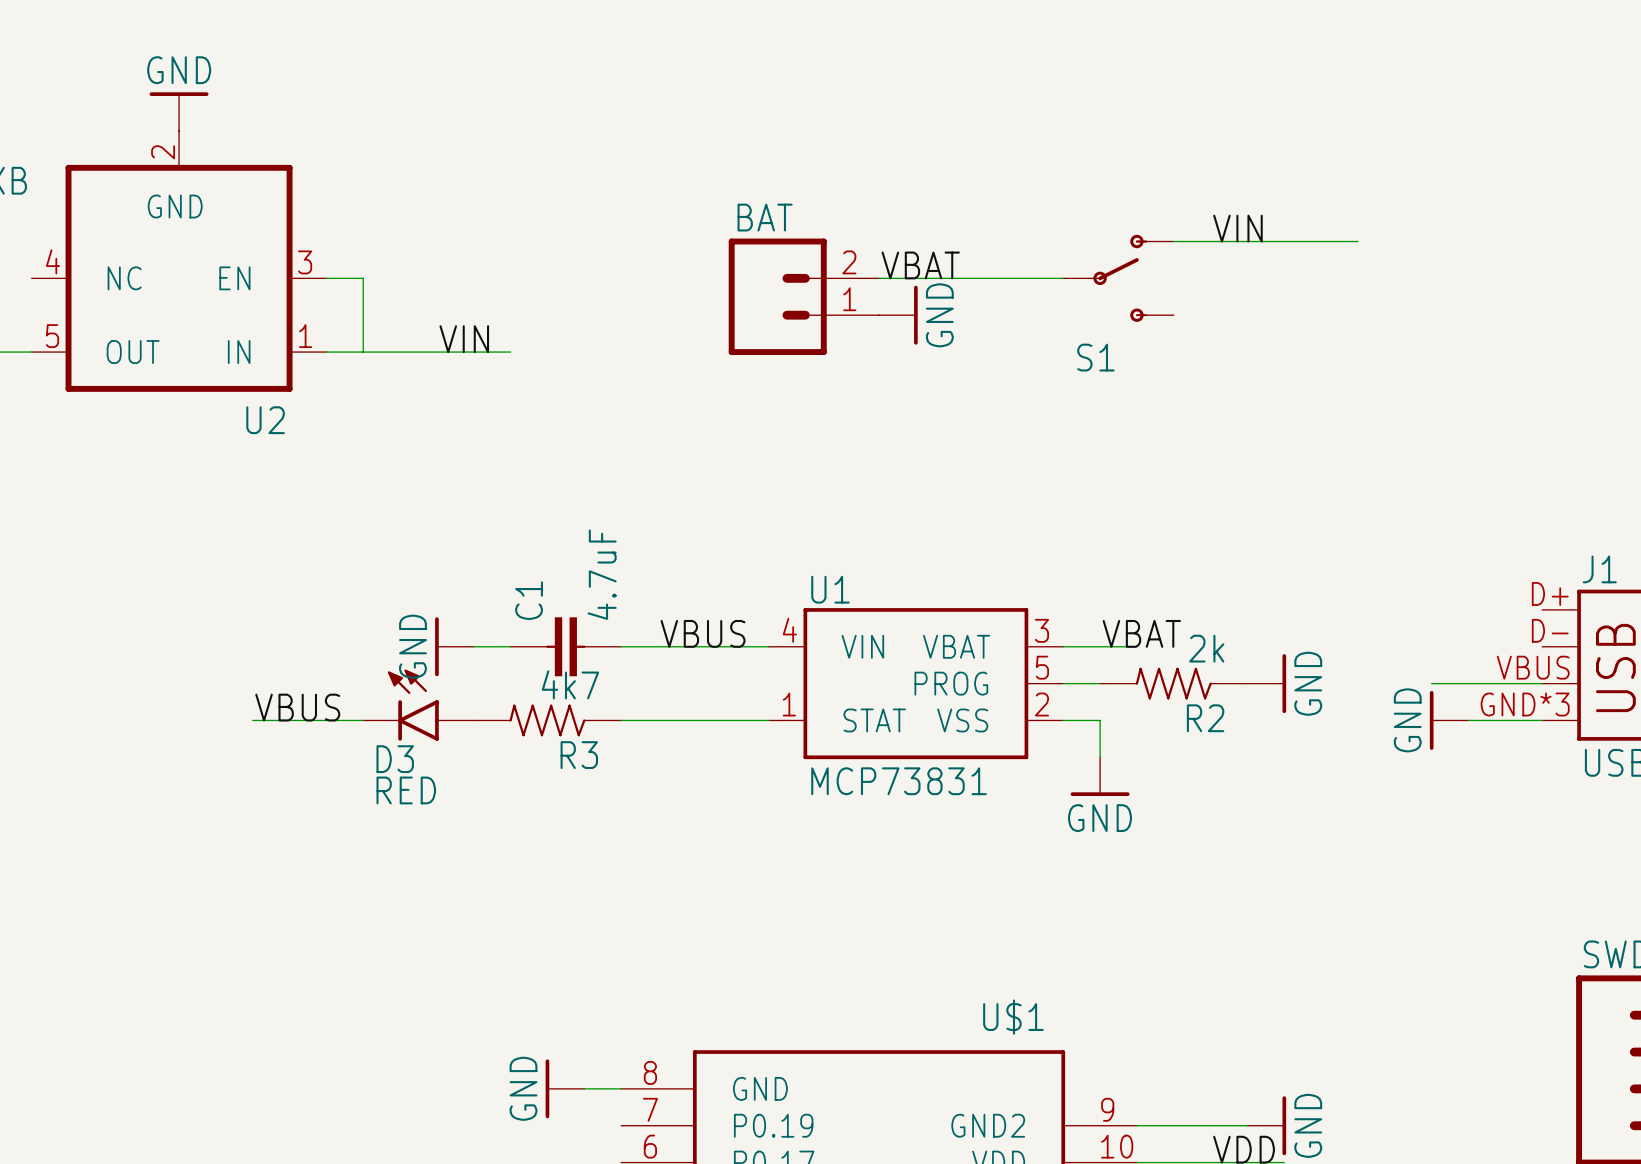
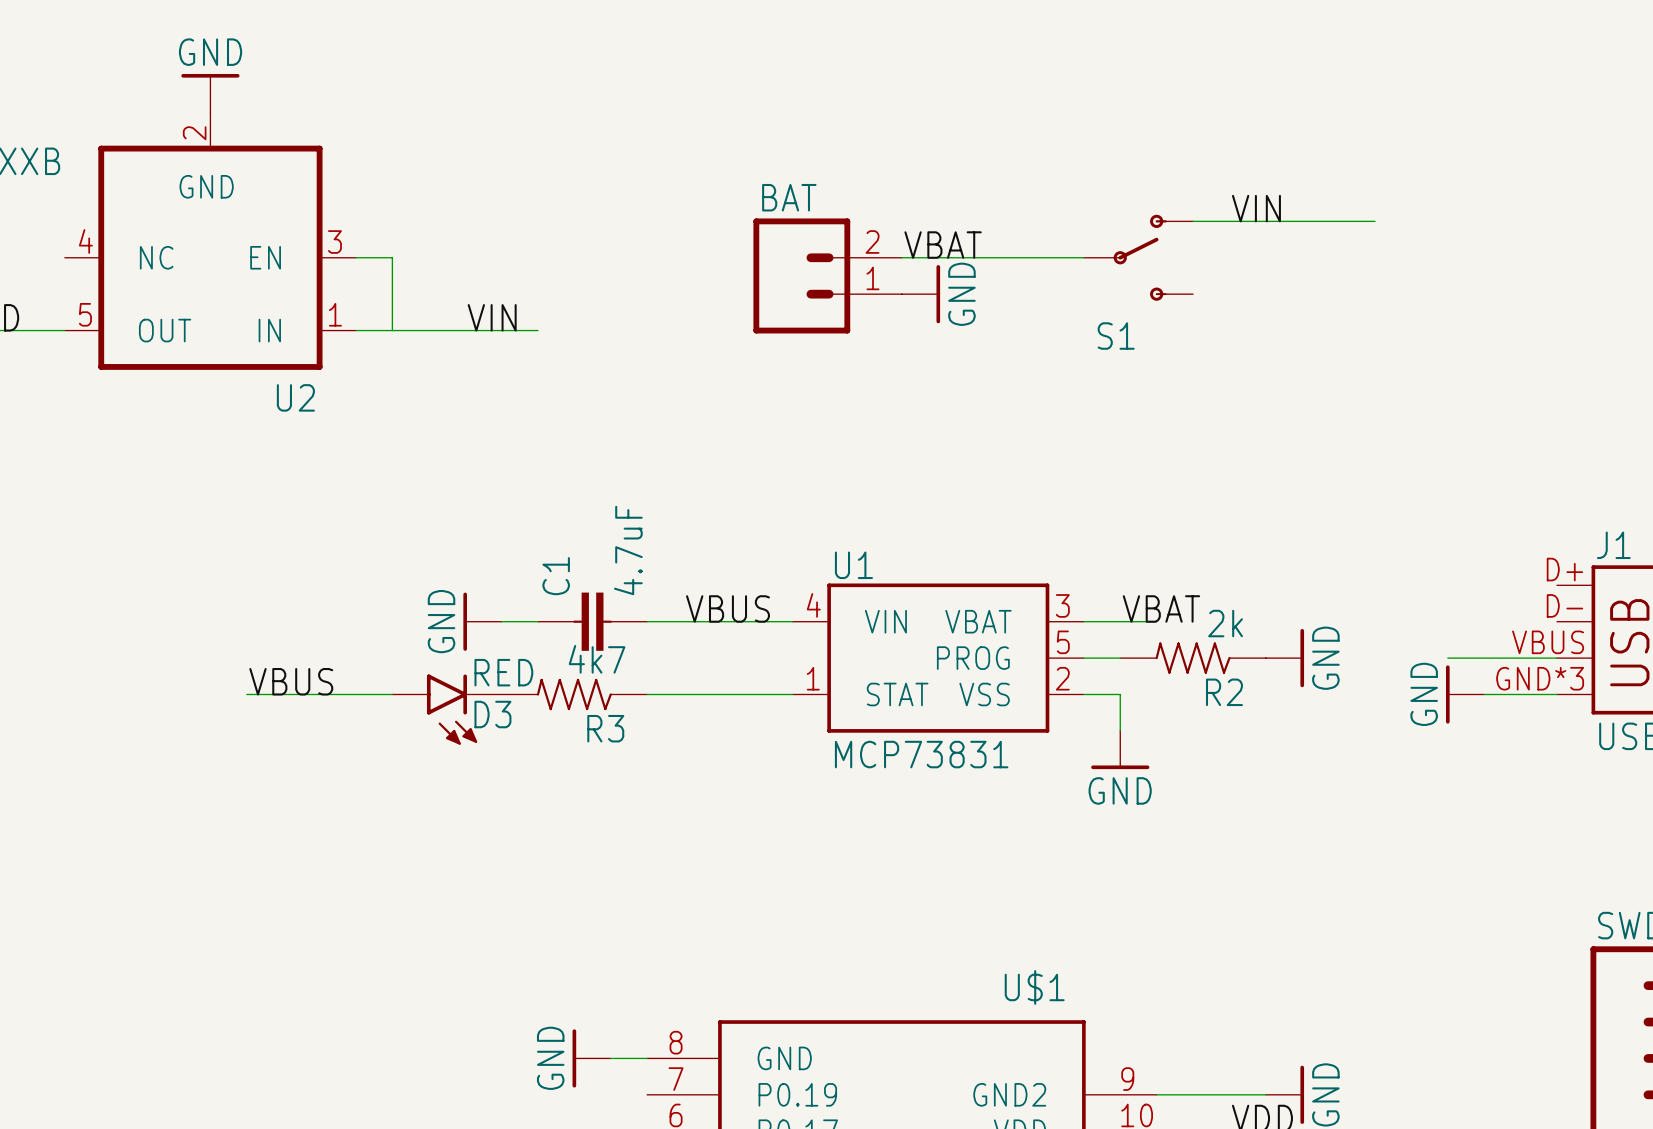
D3 rotation: 0° (413, 705) -> 180° (452, 709)
label position: VBUS (297, 707) -> VBUS (291, 681)
wire: none -> (246, 694) (283, 694)
D3 name position: D3 (395, 759) -> D3 (492, 714)
D3 value position: RED (406, 790) -> RED (503, 672)

